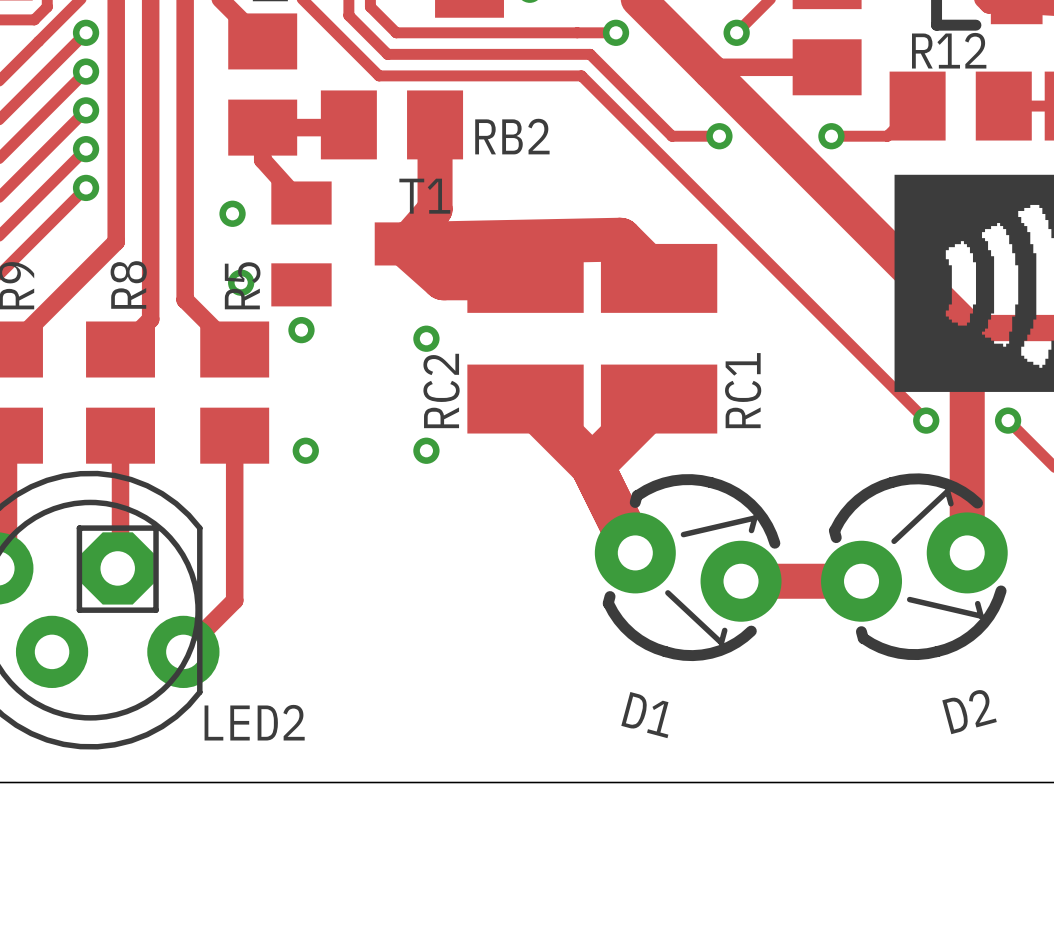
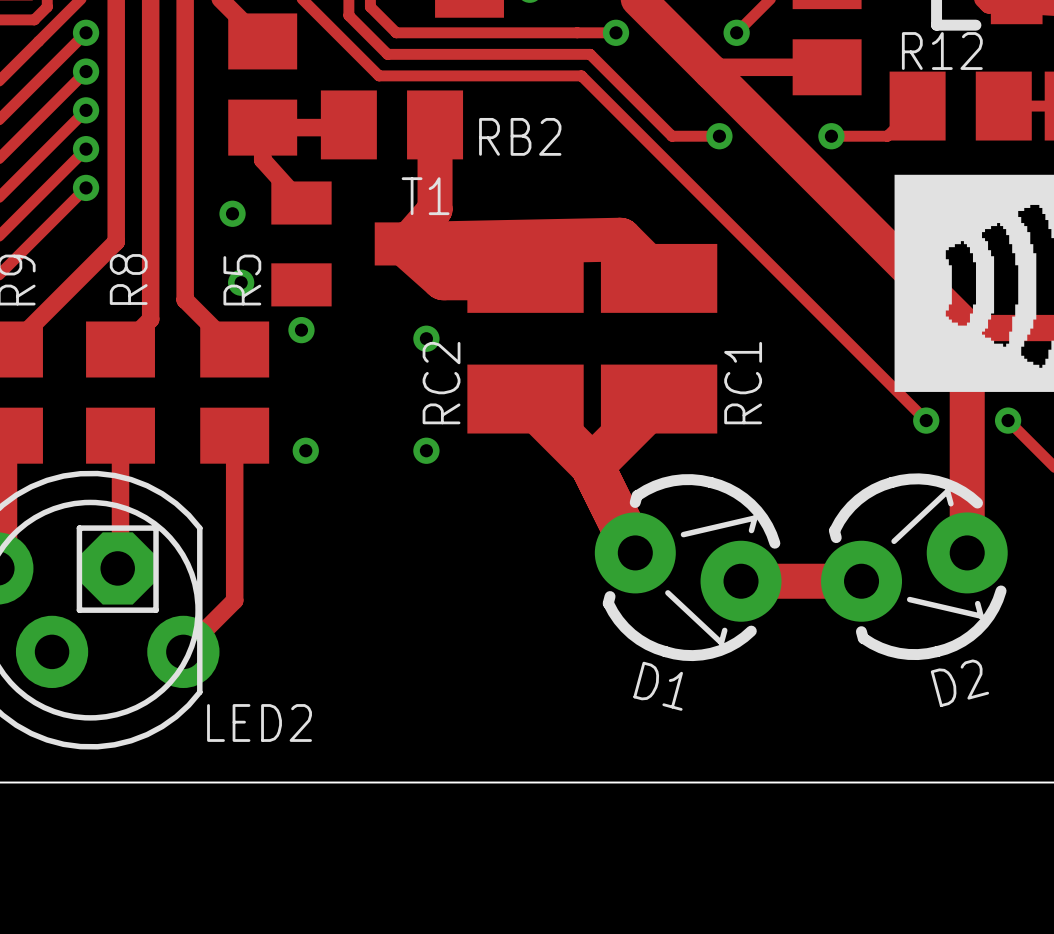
D2 name position: D2 (969, 712) -> D2 (959, 683)
D1 name position: D1 (644, 715) -> D1 (658, 686)

